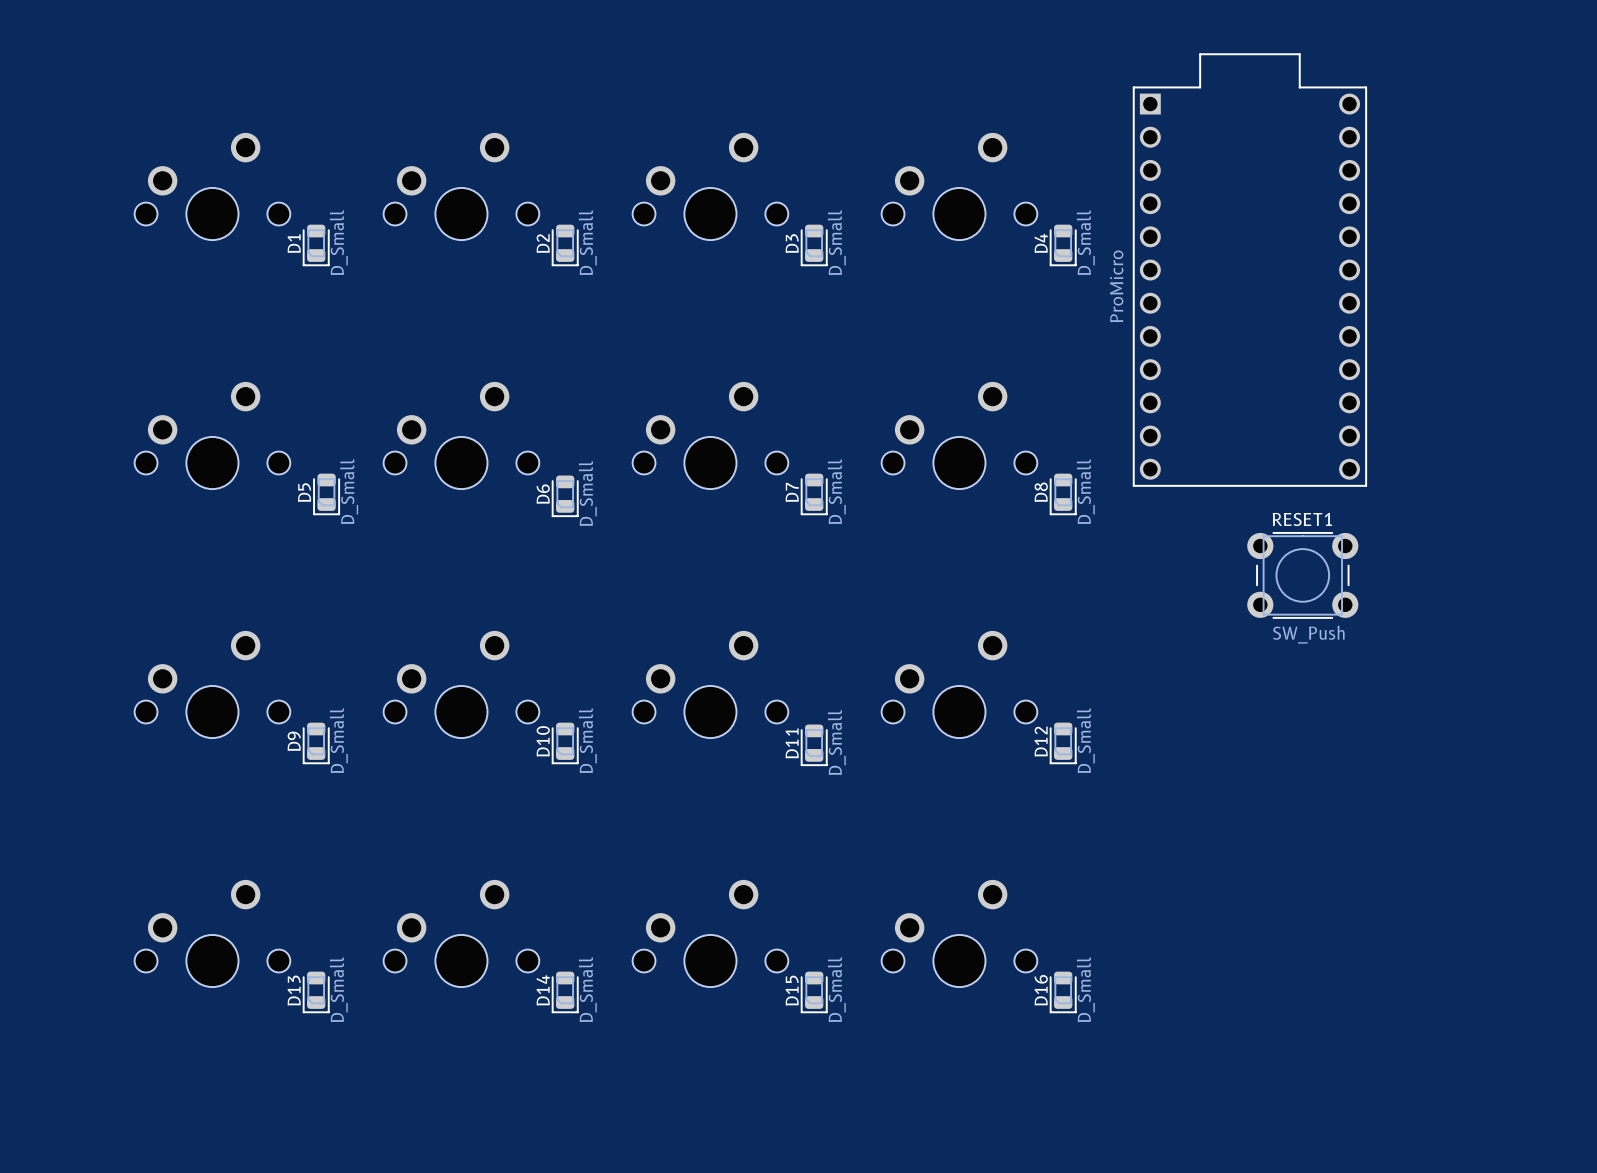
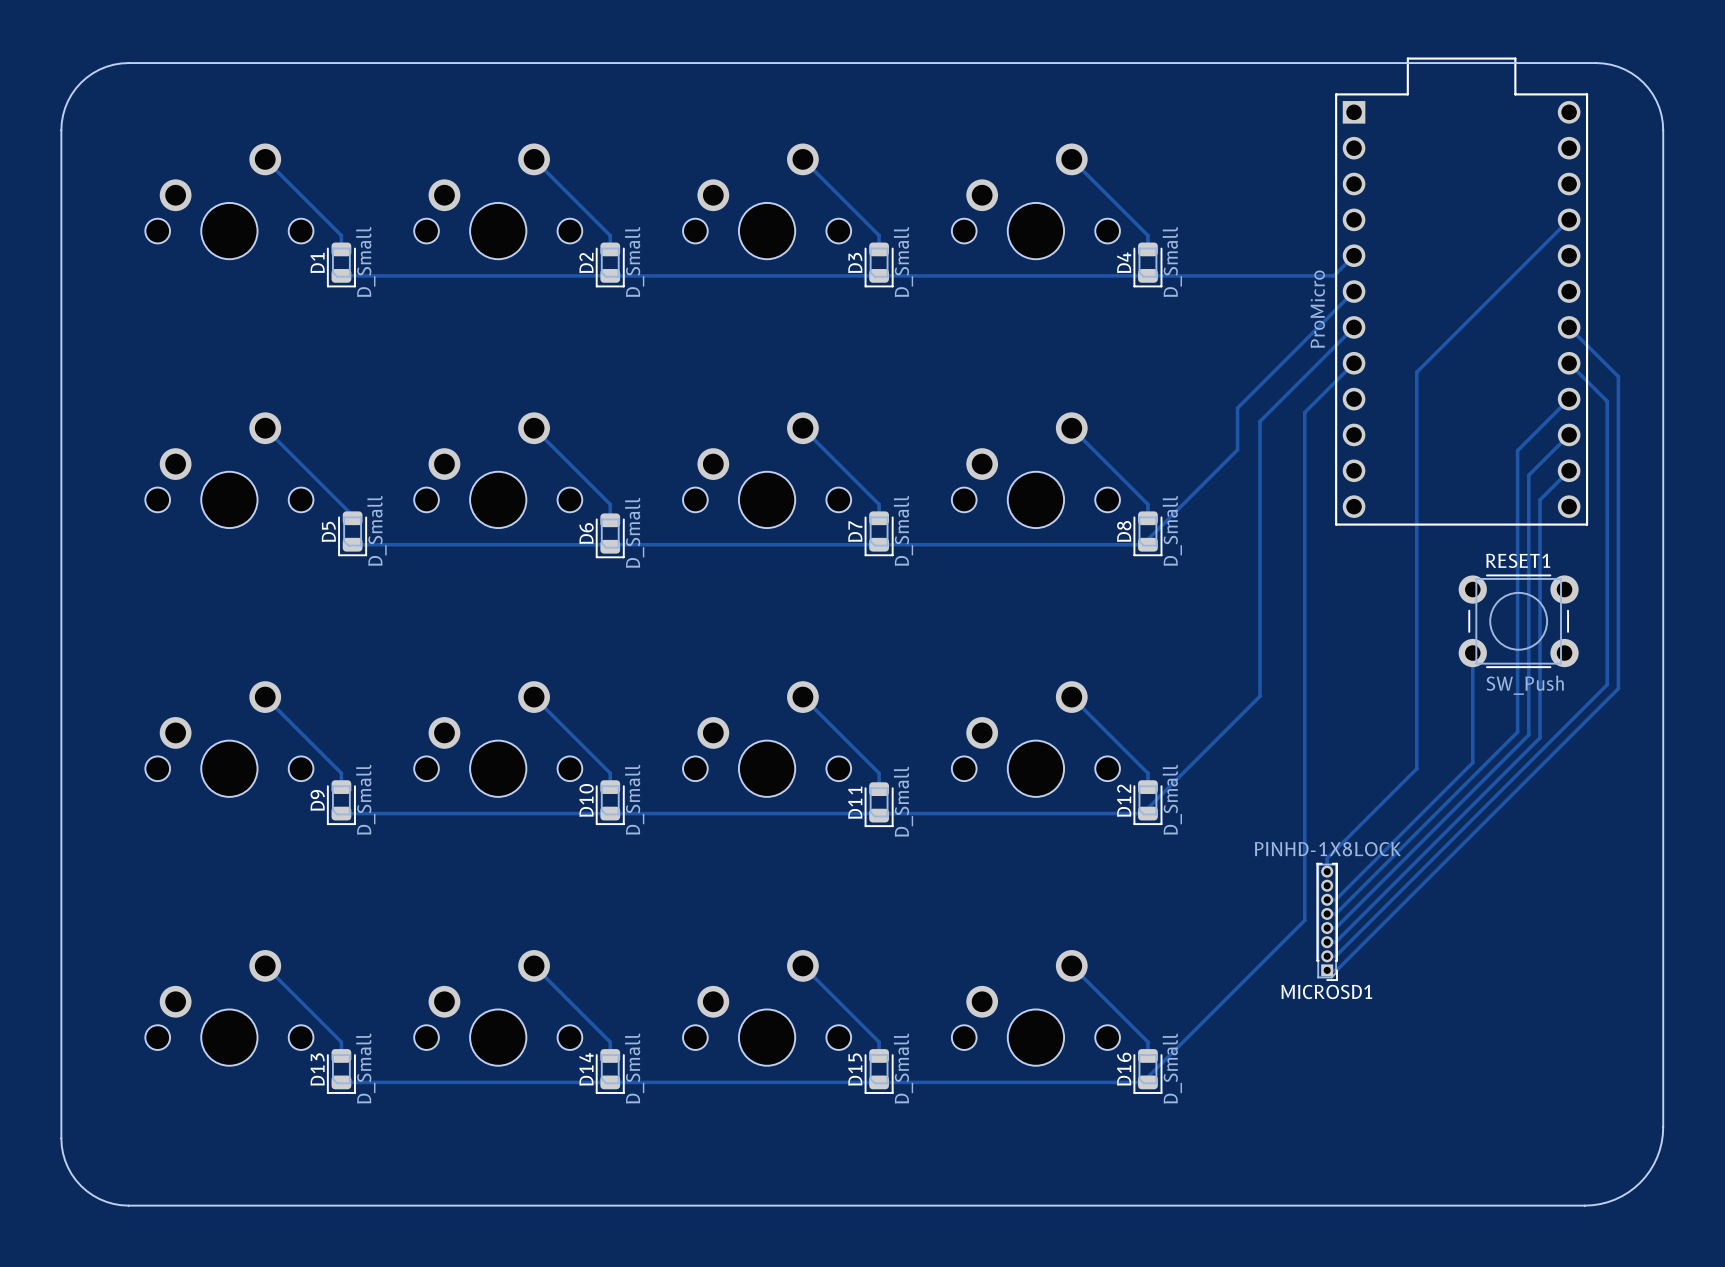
board edge: none -> (128, 63) (1596, 63) (1618, 66) (1637, 77) (1648, 88) (1656, 101) (1661, 115) (1663, 130) (1663, 1127) (1659, 1149) (1650, 1170) (1640, 1182) (1621, 1196) (1600, 1204) (1584, 1205) (128, 1205) (106, 1201) (86, 1190) (76, 1180) (68, 1167) (63, 1153) (61, 1138) (61, 130) (63, 115) (68, 101) (81, 82) (99, 69) (113, 64) (128, 63)
track: none -> (265, 159) (341, 235) (341, 249)
track: none -> (534, 159) (610, 235) (610, 249)
track: none -> (802, 159) (879, 235) (879, 249)
track: none -> (1071, 159) (1147, 235) (1147, 249)
track: none -> (1569, 219) (1416, 372) (1416, 768) (1327, 858) (1327, 871)
track: none -> (1354, 255) (1333, 275) (341, 275)
part position: (1249, 270) -> (1461, 291)
track: none -> (1354, 291) (1237, 408) (1237, 449) (1142, 544) (352, 544)
track: none -> (1354, 327) (1259, 421) (1259, 696) (1142, 813) (341, 813)
track: none -> (1569, 327) (1618, 376) (1618, 688) (1336, 970) (1327, 970)
track: none -> (1354, 363) (1304, 412) (1304, 920) (1142, 1082) (341, 1082)
track: none -> (1569, 363) (1607, 401) (1607, 684) (1335, 956) (1327, 956)
track: none -> (1569, 399) (1517, 450) (1517, 732) (1335, 913) (1327, 913)
track: none -> (265, 428) (352, 515) (352, 518)
track: none -> (534, 428) (610, 504) (610, 520)
track: none -> (802, 428) (879, 504) (879, 518)
track: none -> (1071, 428) (1147, 504) (1147, 518)
track: none -> (1569, 434) (1528, 475) (1528, 734) (1335, 928) (1327, 928)
track: none -> (1569, 470) (1540, 499) (1540, 737) (1335, 942) (1327, 942)
RESET1 position: (1302, 575) -> (1518, 621)
track: none -> (1472, 653) (1472, 762) (1335, 899) (1327, 899)
track: none -> (265, 697) (341, 773) (341, 787)
track: none -> (534, 697) (610, 773) (610, 787)
track: none -> (802, 697) (879, 773) (879, 789)
track: none -> (1071, 697) (1147, 773) (1147, 787)
MICROSD1: none -> PINHD-1X8LOCK (1327, 921)
track: none -> (265, 965) (341, 1042) (341, 1055)
track: none -> (534, 965) (610, 1042) (610, 1055)
track: none -> (802, 965) (879, 1042) (879, 1055)
track: none -> (1071, 965) (1147, 1042) (1147, 1055)

